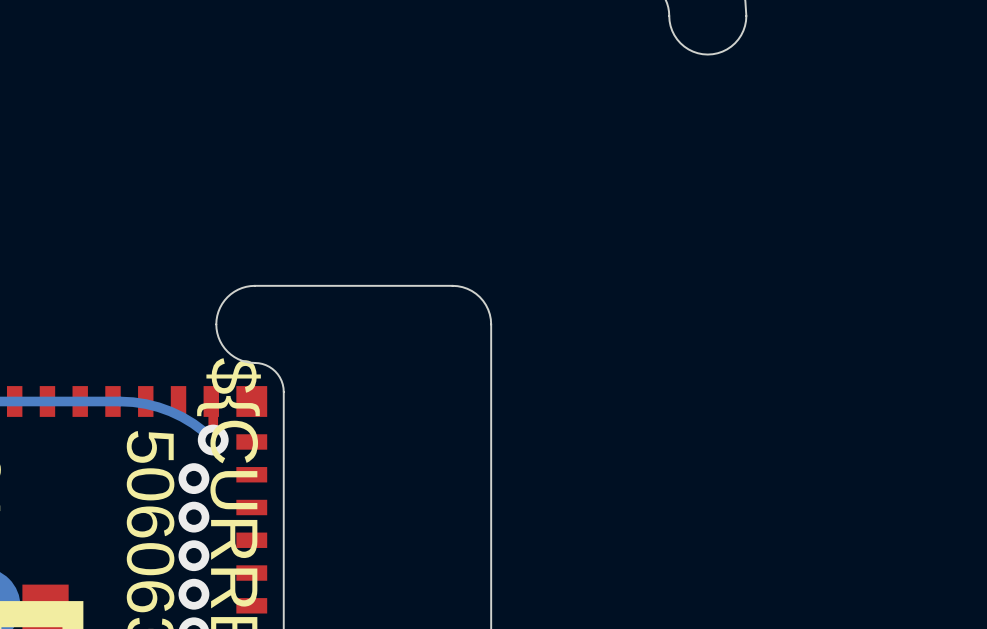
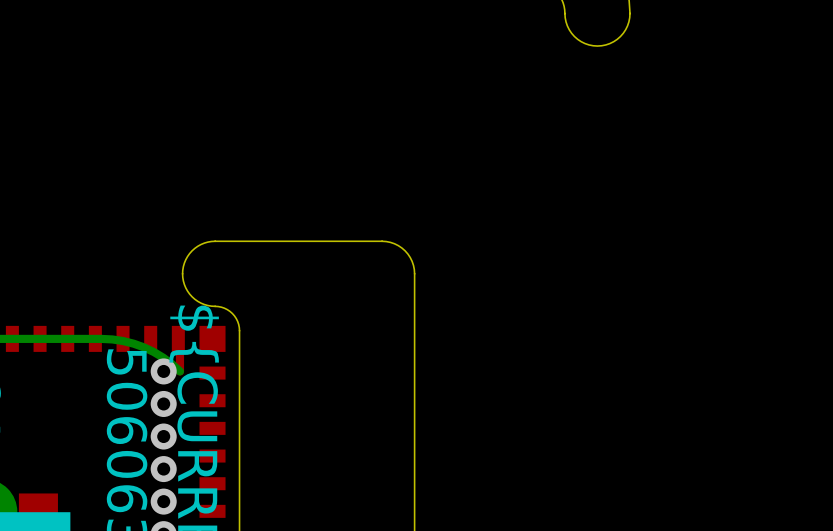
via position: (213, 440) -> (163, 371)

